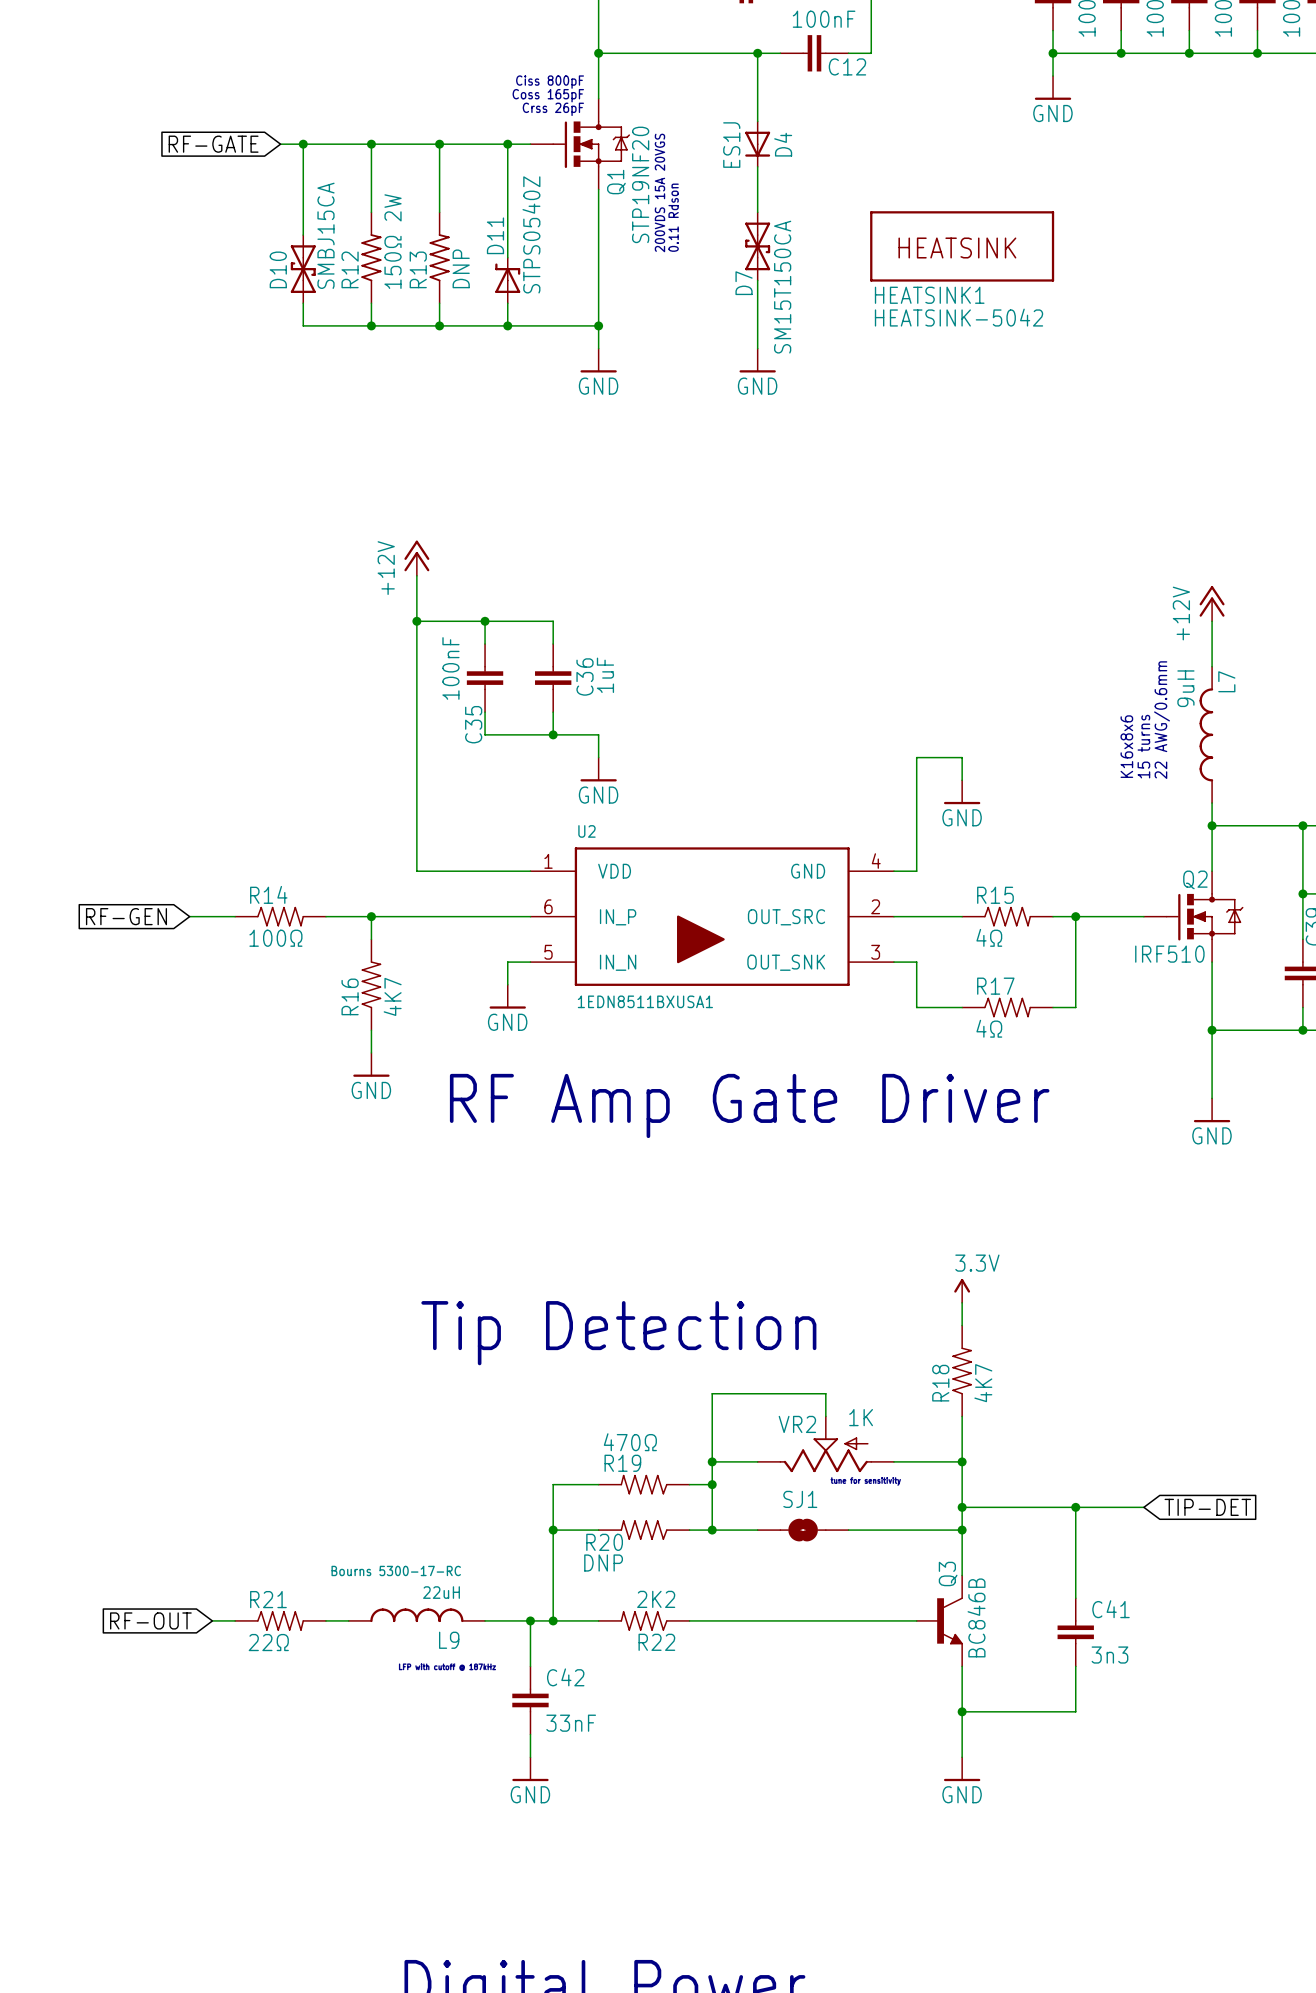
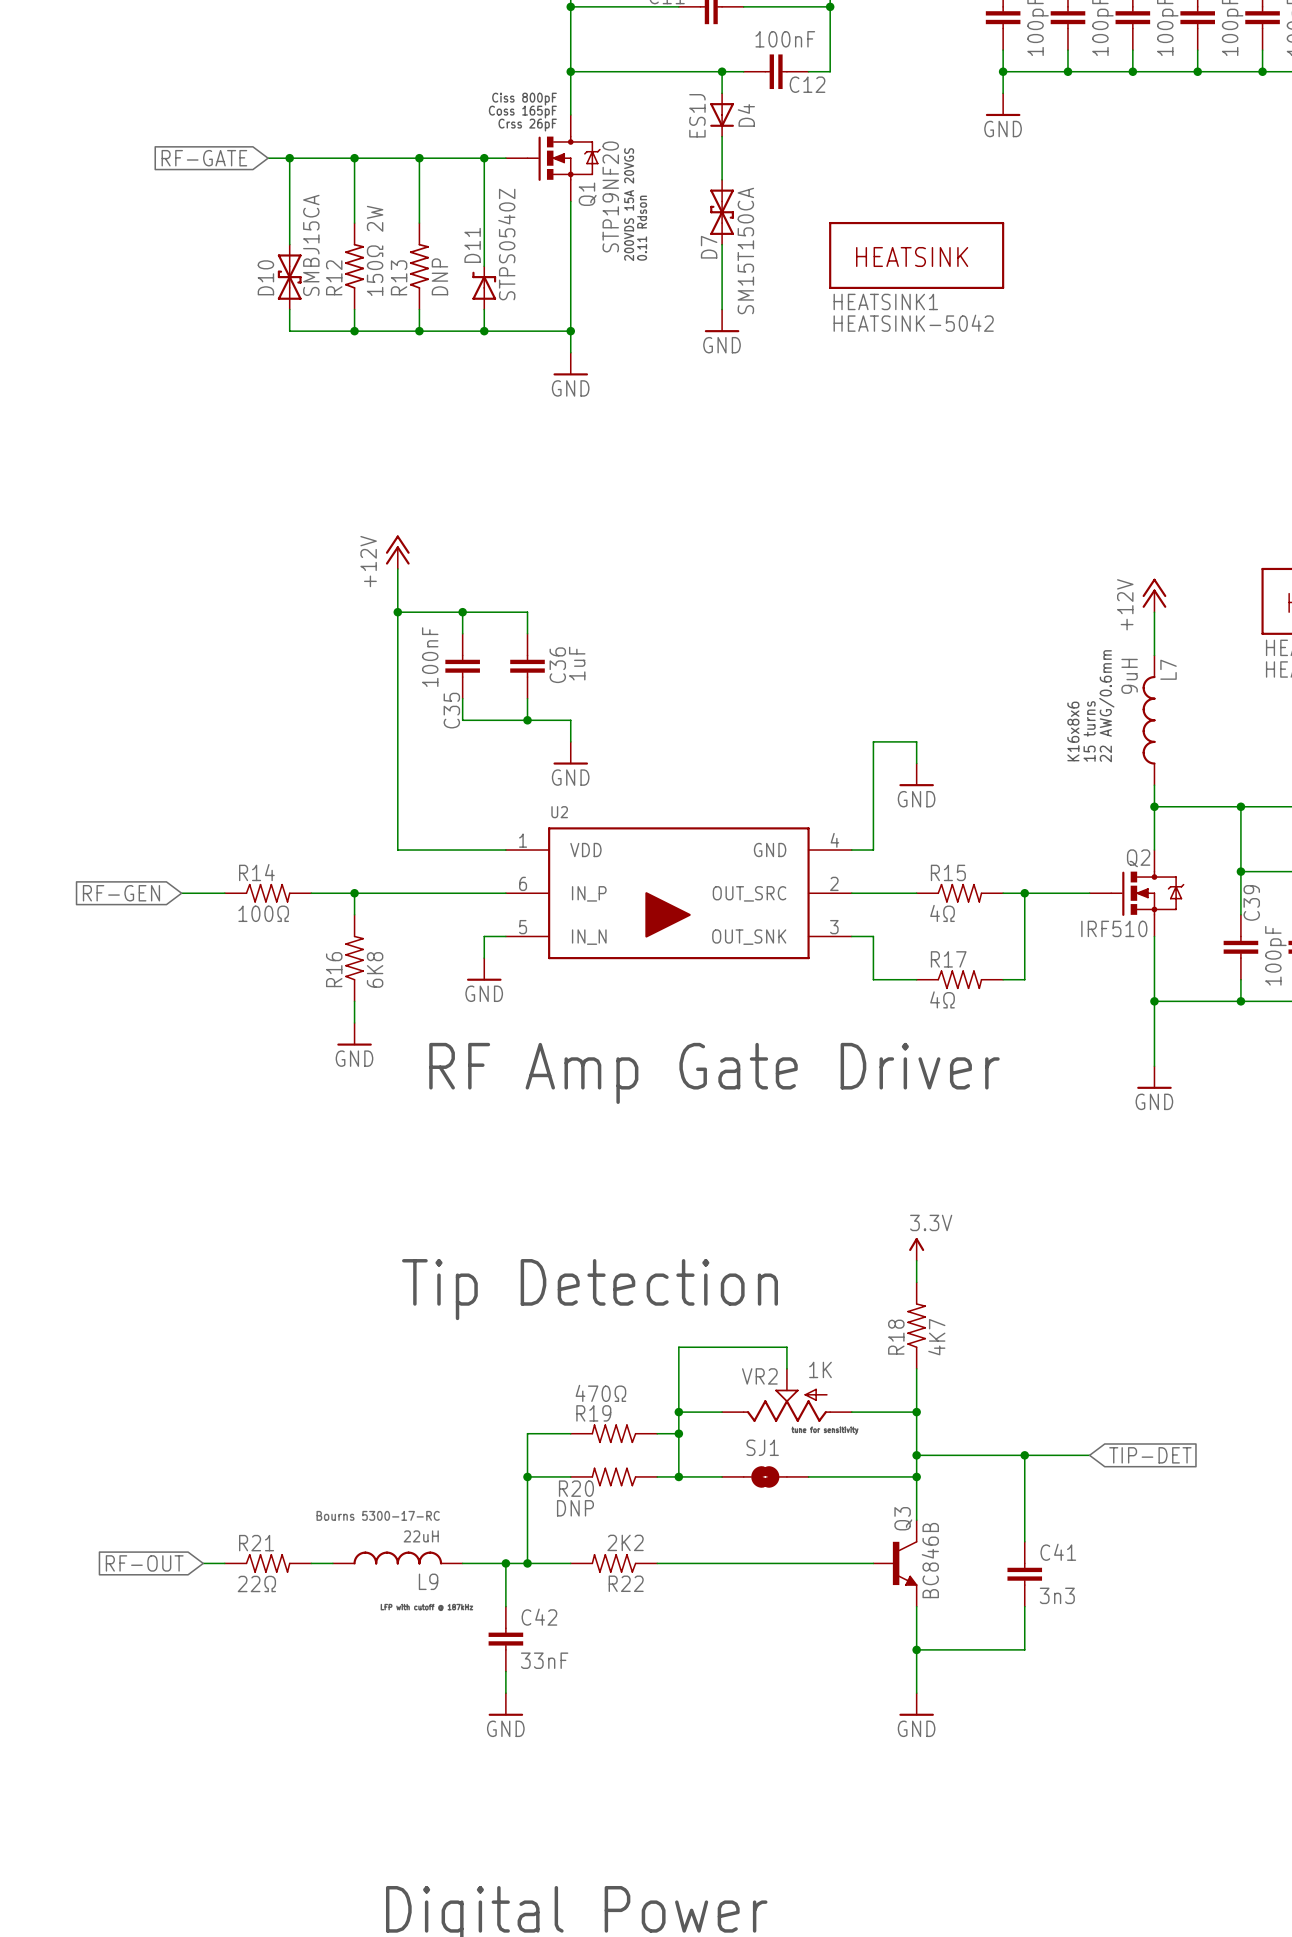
D4 position: (757, 144) -> (722, 114)
D7 position: (757, 246) -> (722, 212)
power symbol position: GND (757, 360) -> GND (722, 320)
R16 value: 4K7 (392, 996) -> 6K8 (375, 969)
U2 value: 1EDN8511BXUSA1 (645, 1001) -> none

